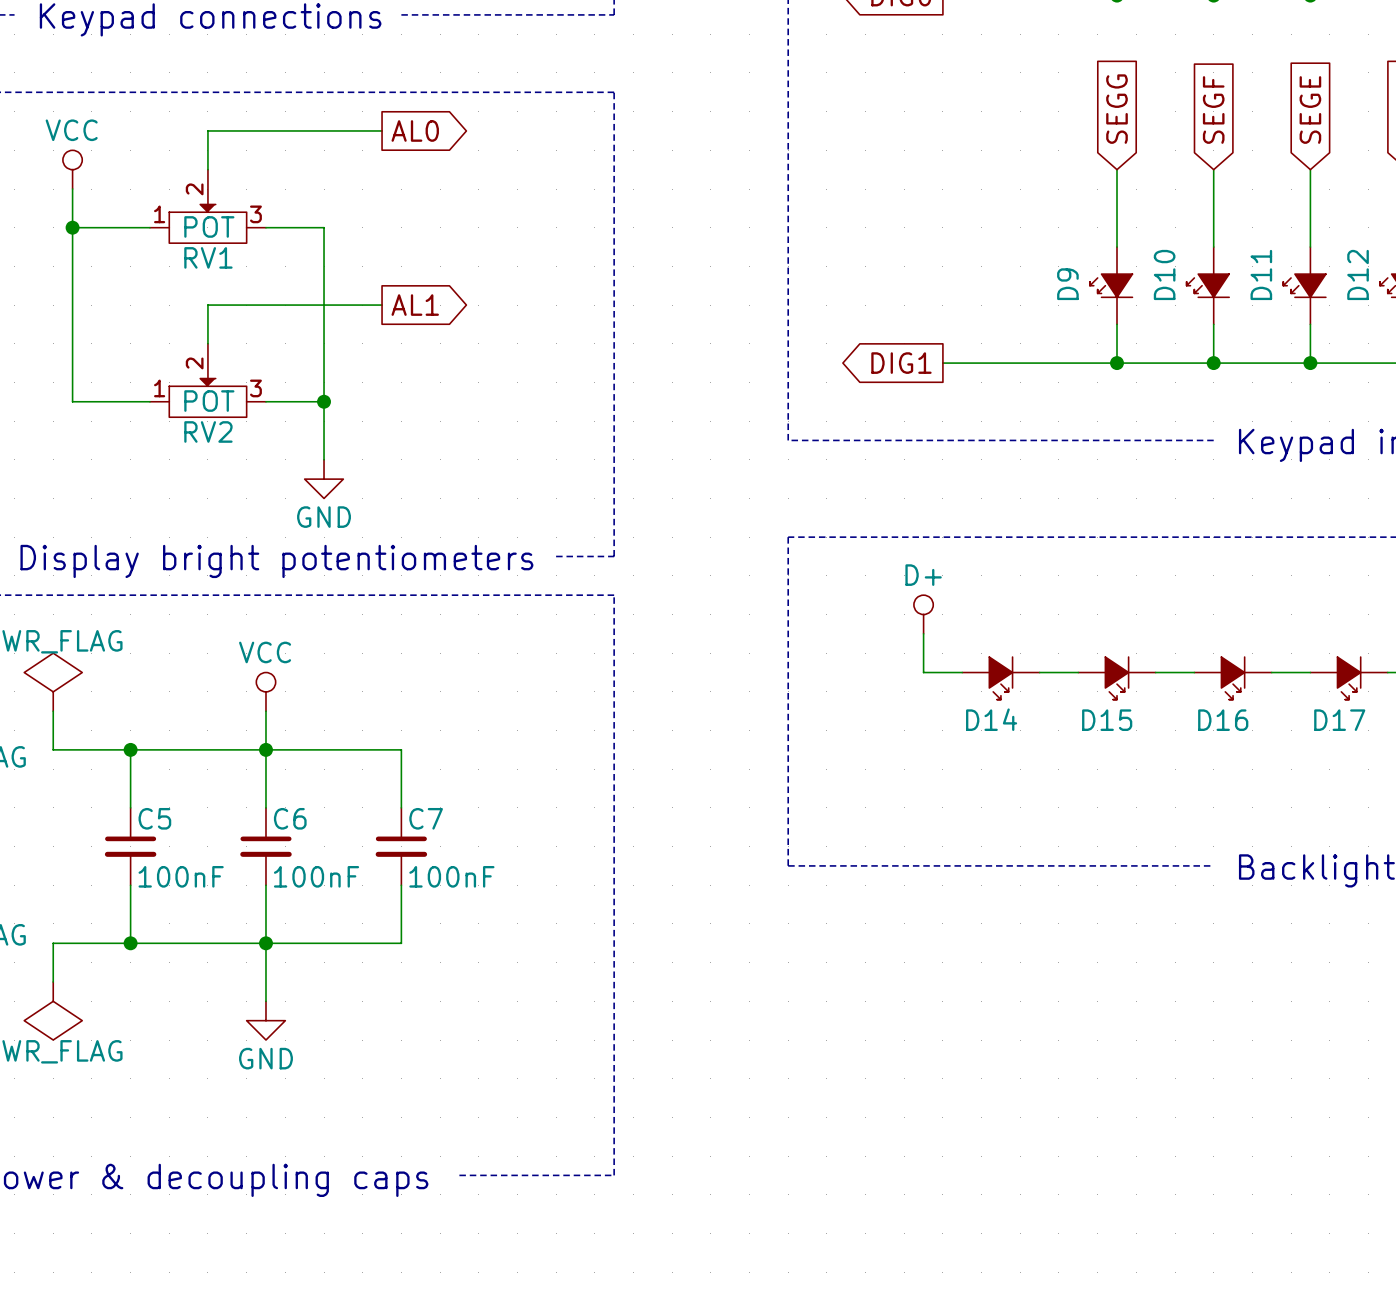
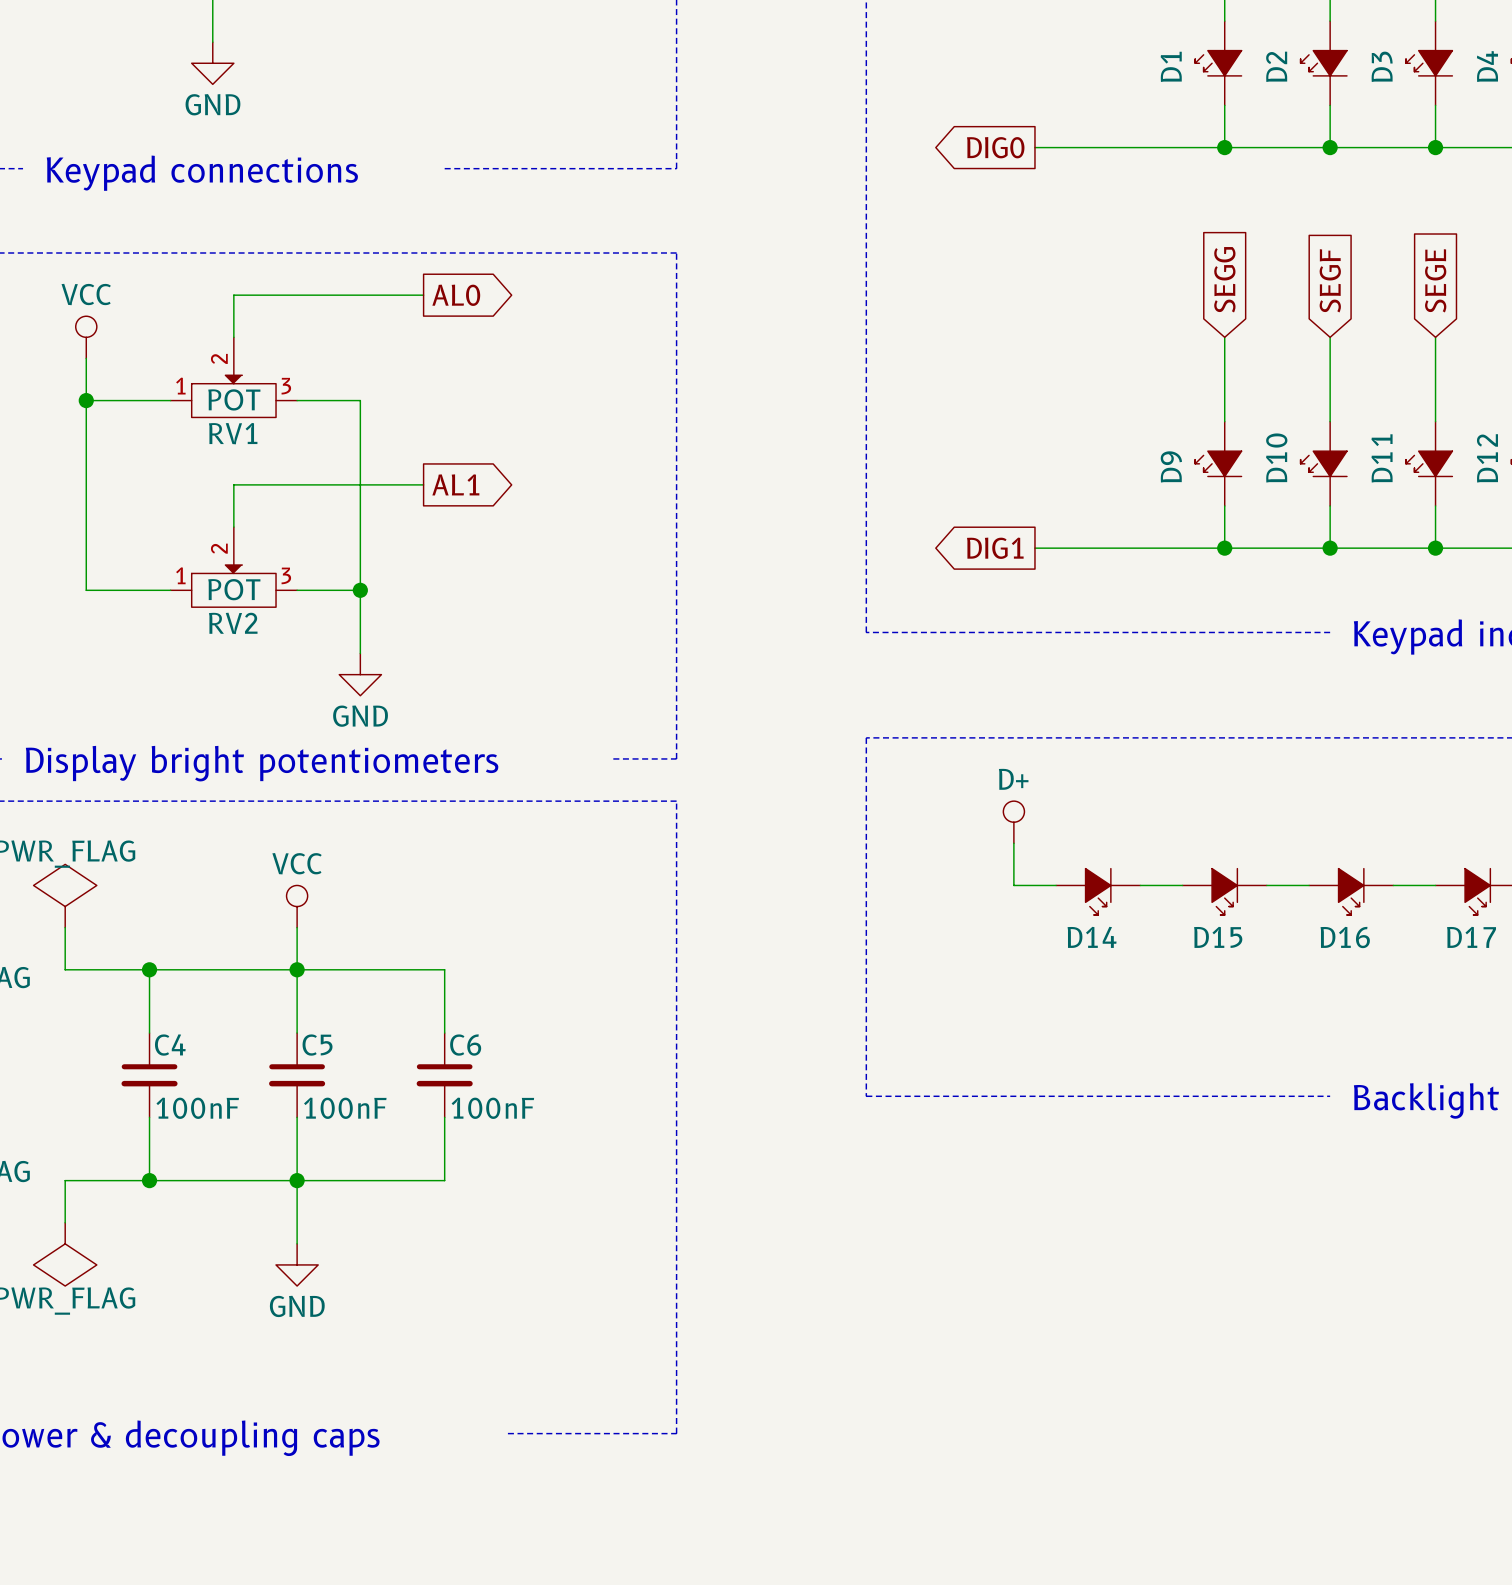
C5 name: C5 (154, 818) -> C4 (170, 1045)
C6 name: C6 (290, 818) -> C5 (317, 1045)
C7 name: C7 (426, 818) -> C6 (465, 1045)

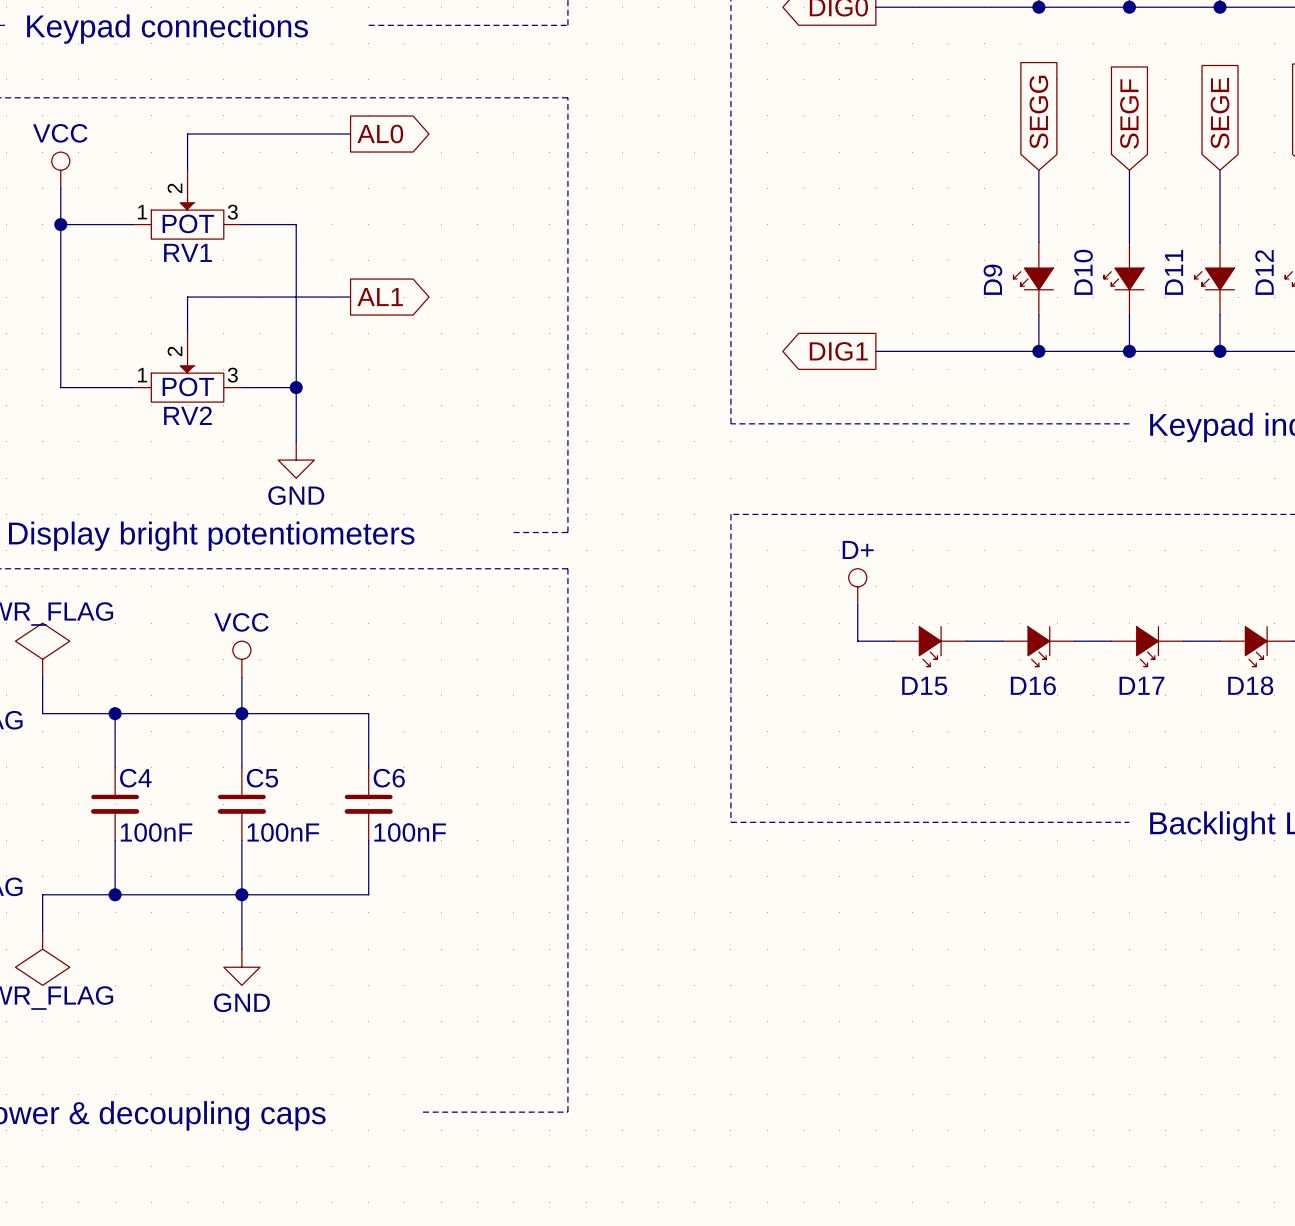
D14 name: D14 (1092, 937) -> D15 (924, 685)
D15 name: D15 (1218, 937) -> D16 (1033, 685)
D16 name: D16 (1345, 937) -> D17 (1141, 685)
D17 name: D17 (1471, 937) -> D18 (1250, 685)

